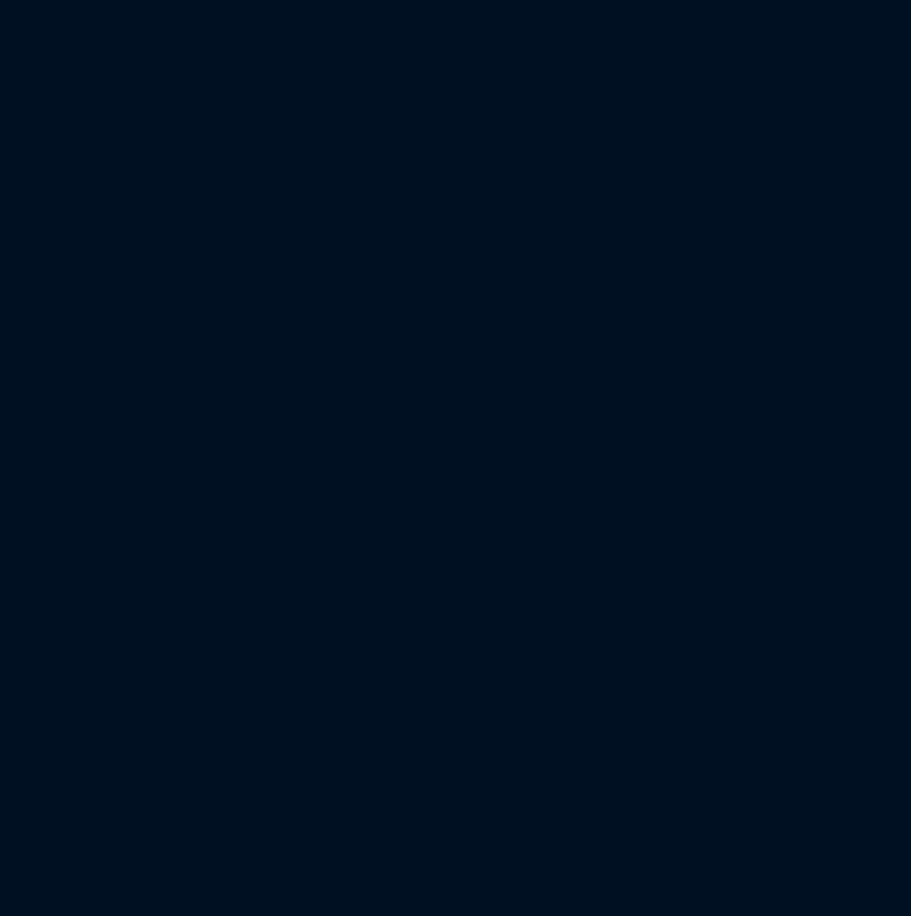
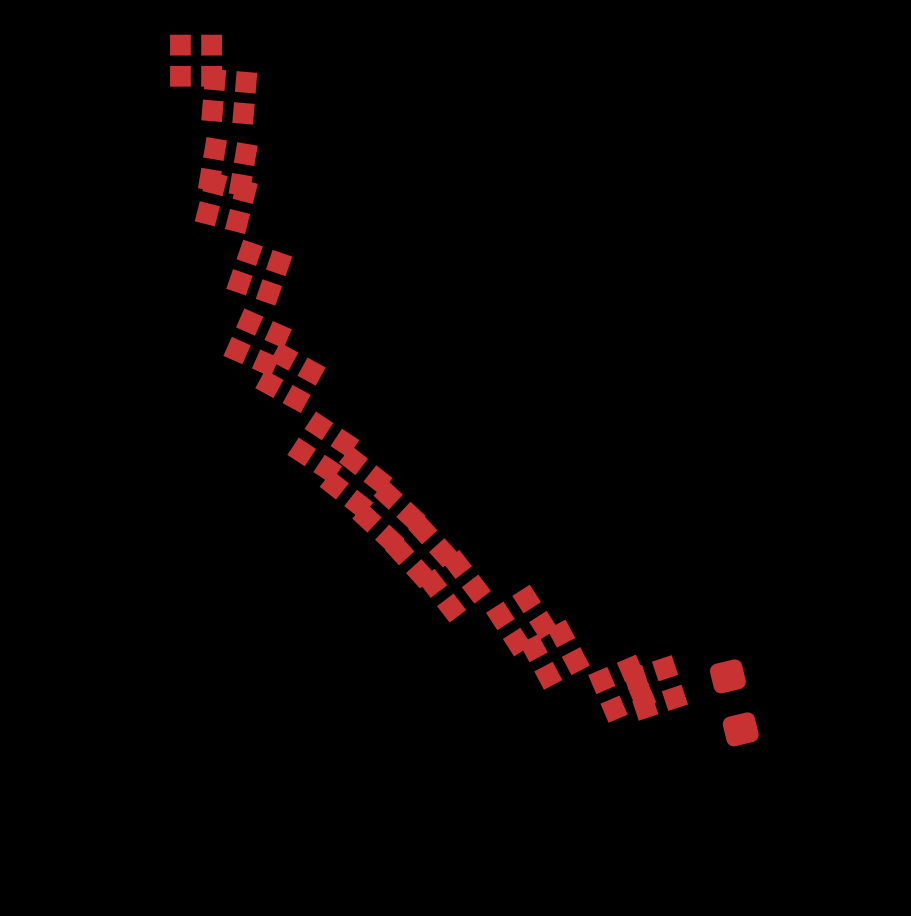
part: none -> (196, 60)
part: none -> (229, 96)
part: none -> (227, 166)
part: none -> (226, 202)
part: none -> (259, 272)
part: none -> (257, 342)
part: none -> (290, 377)
part: none -> (323, 447)
part: none -> (356, 482)
part: none -> (388, 517)
part: none -> (421, 551)
part: none -> (454, 586)
part: none -> (521, 620)
part: none -> (554, 654)
part: none -> (655, 687)
part: none -> (622, 688)
part: none -> (734, 702)

